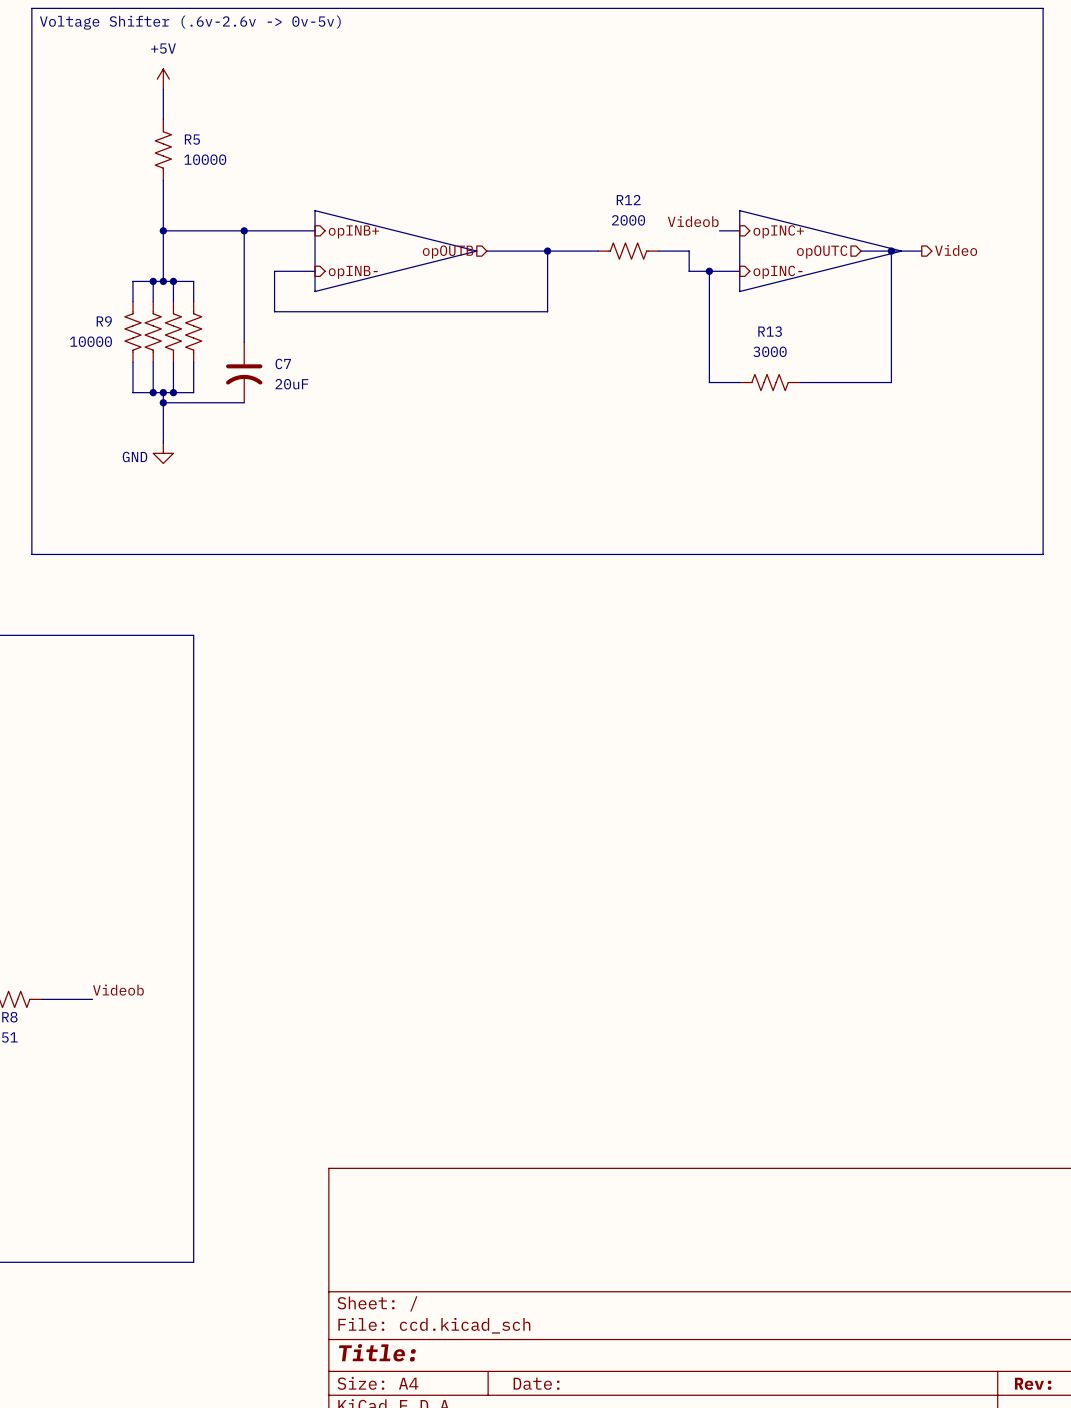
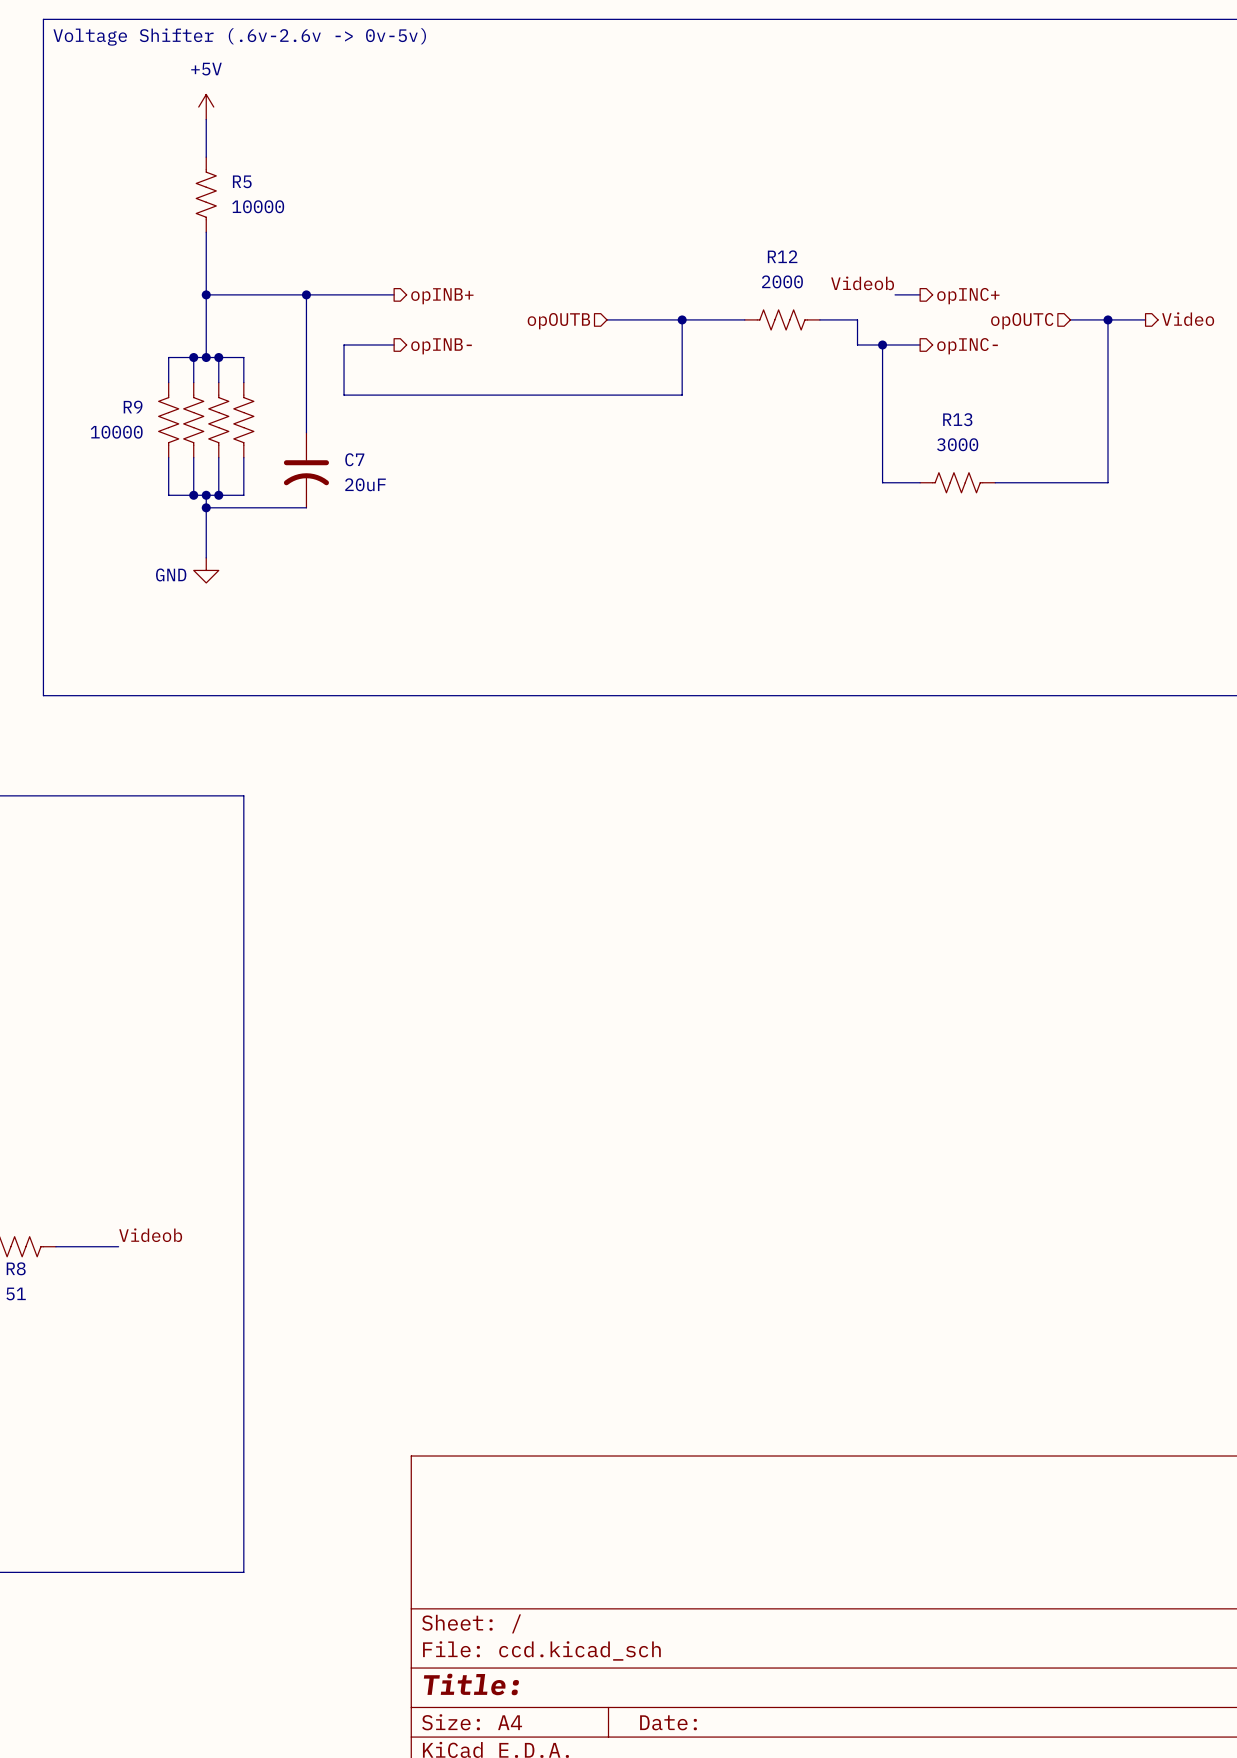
line: (315, 210) (315, 291) (476, 251) (340, 216) (315, 210) -> none
line: (739, 210) (739, 291) (901, 251) (876, 244) (739, 210) -> none

